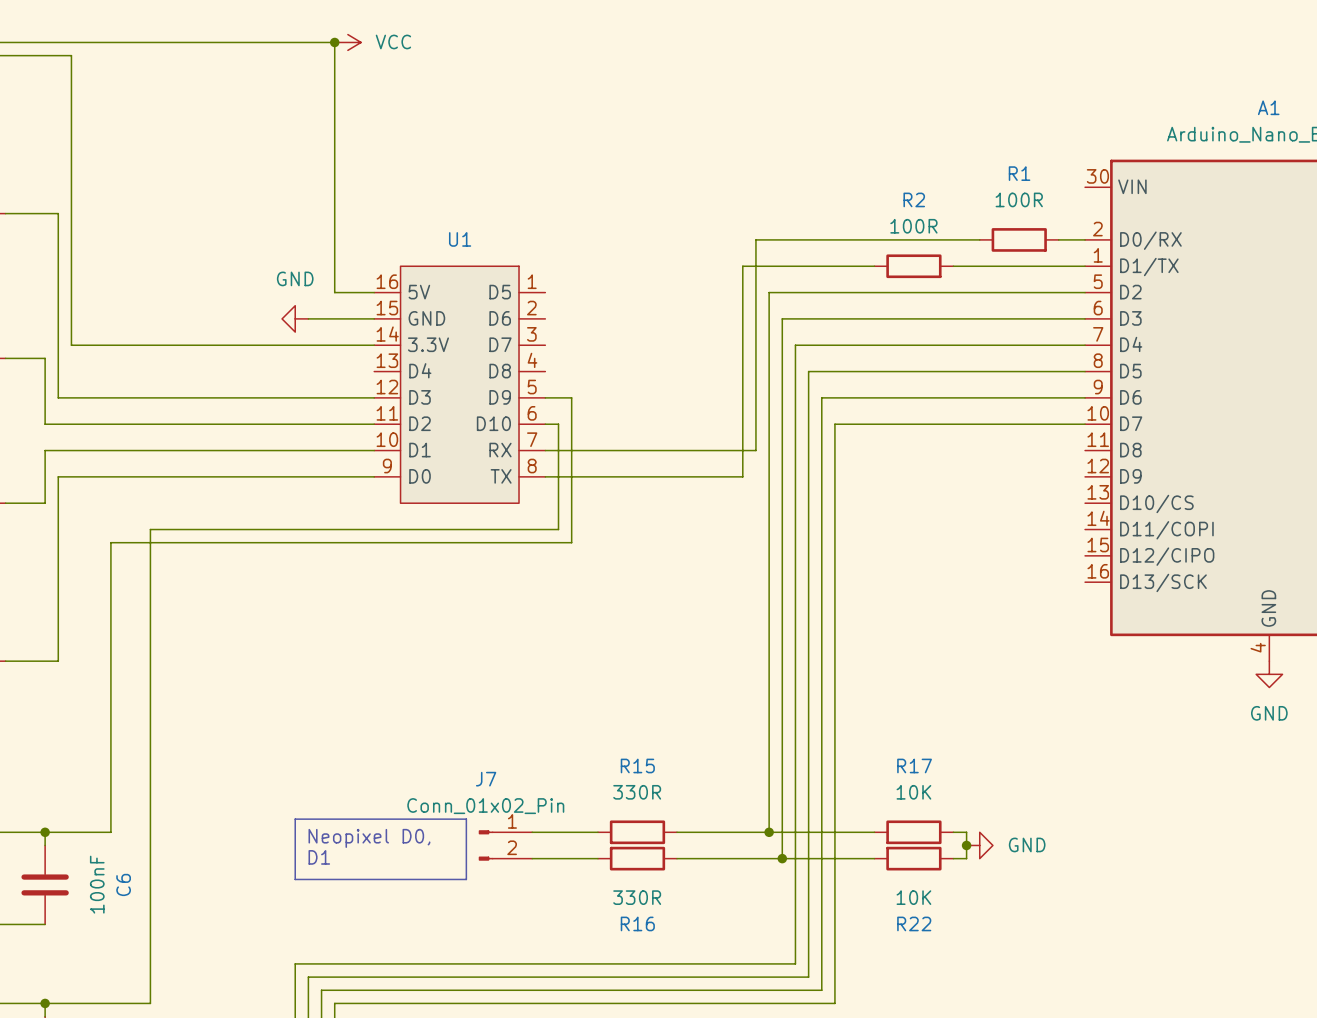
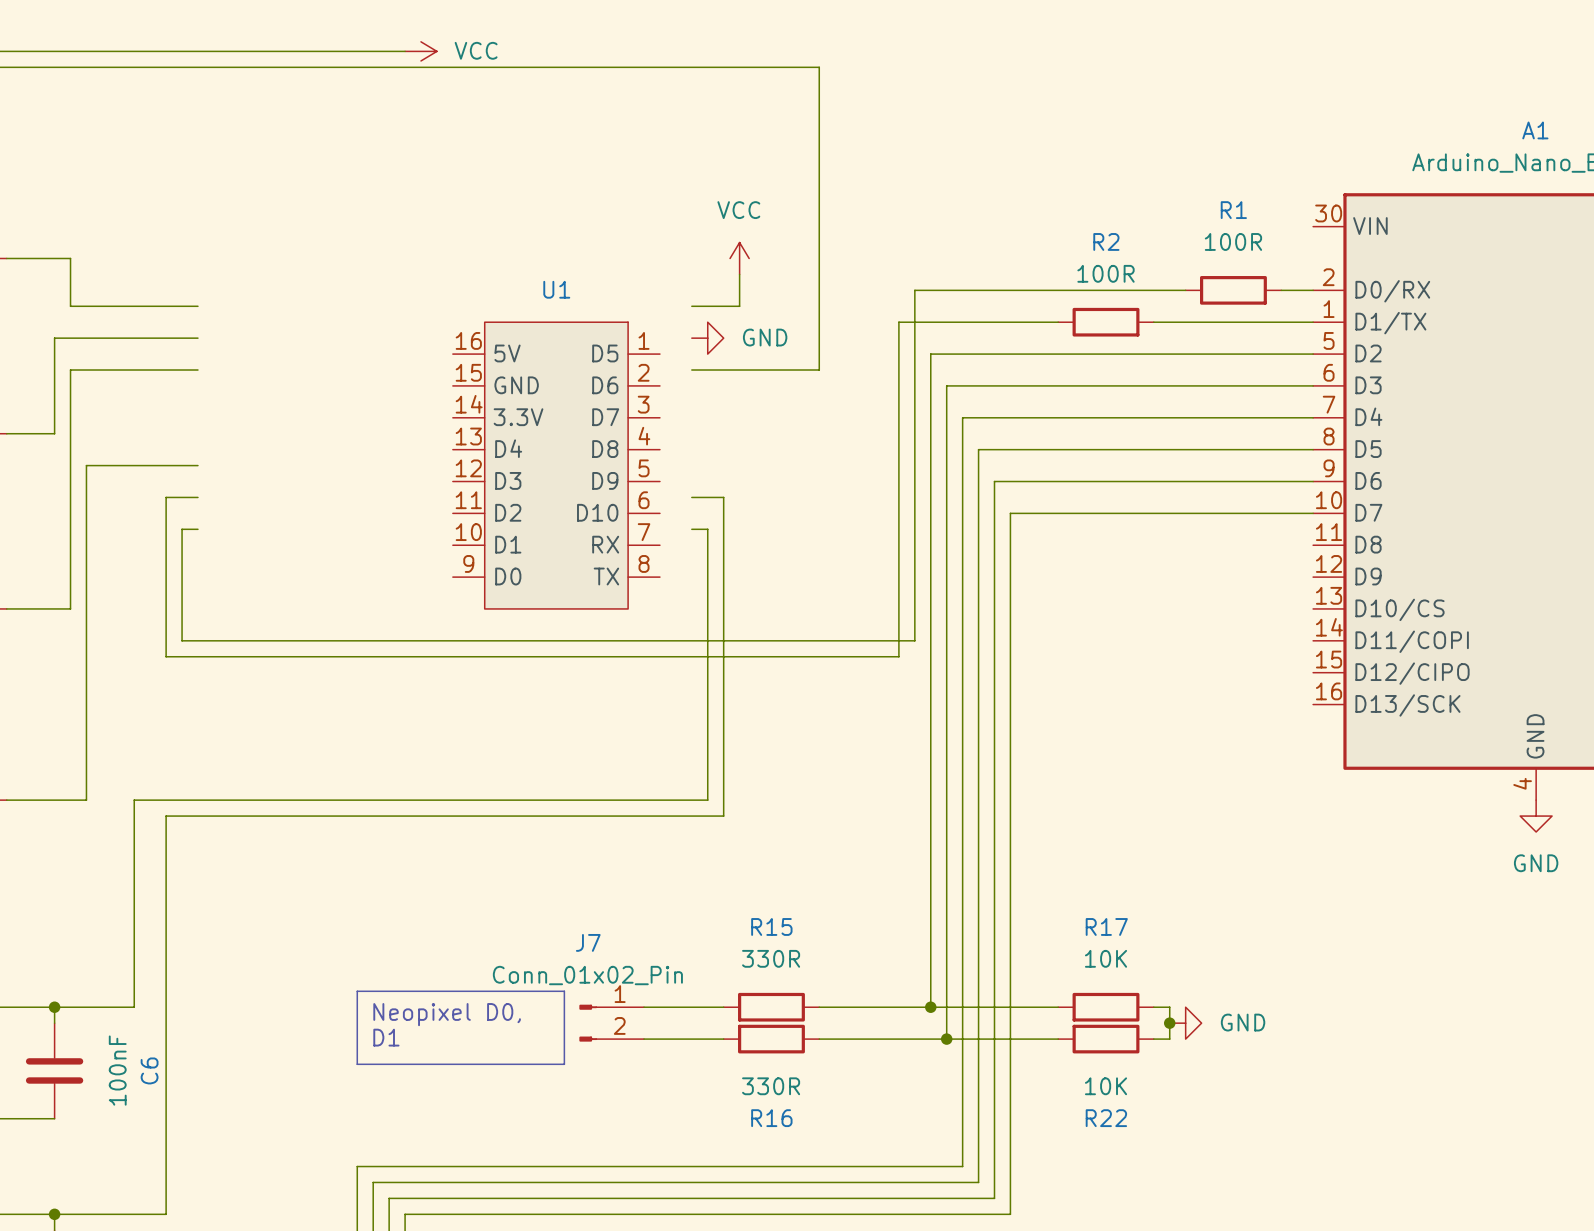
wire: (334, 42) (334, 292) (374, 292) -> none
junction: (334, 42) -> none
wire: (71, 55) (71, 345) (374, 345) -> (86, 67) (819, 67) (819, 370) (691, 370)
power symbol: none -> VCC (739, 258)
wire: none -> (739, 274) (739, 306) (691, 306)
wire: (58, 253) (58, 305) -> (70, 306) (197, 306)
power symbol: none -> GND (707, 338)
wire: none -> (70, 370) (197, 370)
power symbol: GND (295, 318) -> none
wire: (308, 318) (374, 318) -> none
wire: (45, 358) (45, 424) (374, 424) -> (54, 433) (54, 338) (197, 338)
wire: none -> (197, 465) (86, 465) (86, 800) (70, 800)
wire: (58, 397) (374, 397) -> (70, 481) (70, 577)
wire: (545, 397) (571, 397) (571, 542) -> none
wire: (545, 424) (558, 424) (558, 529) -> none
wire: none -> (197, 529) (182, 529) (182, 640)
wire: none -> (691, 529) (707, 529) (707, 800) (134, 800)
wire: (374, 450) (45, 450) (45, 503) -> none
wire: (545, 450) (755, 450) -> (675, 640) (914, 640) (914, 545)
wire: (58, 476) (374, 476) -> none
wire: (545, 476) (742, 476) -> (691, 656) (898, 656) (898, 577)
wire: (58, 503) (58, 661) -> (70, 608) (54, 608)
wire: (150, 529) (150, 1003) (137, 1003) -> (691, 497) (723, 497) (723, 816) (166, 816) (166, 1214)
wire: (137, 542) (110, 542) (110, 661) -> (166, 656) (166, 497) (197, 497)

